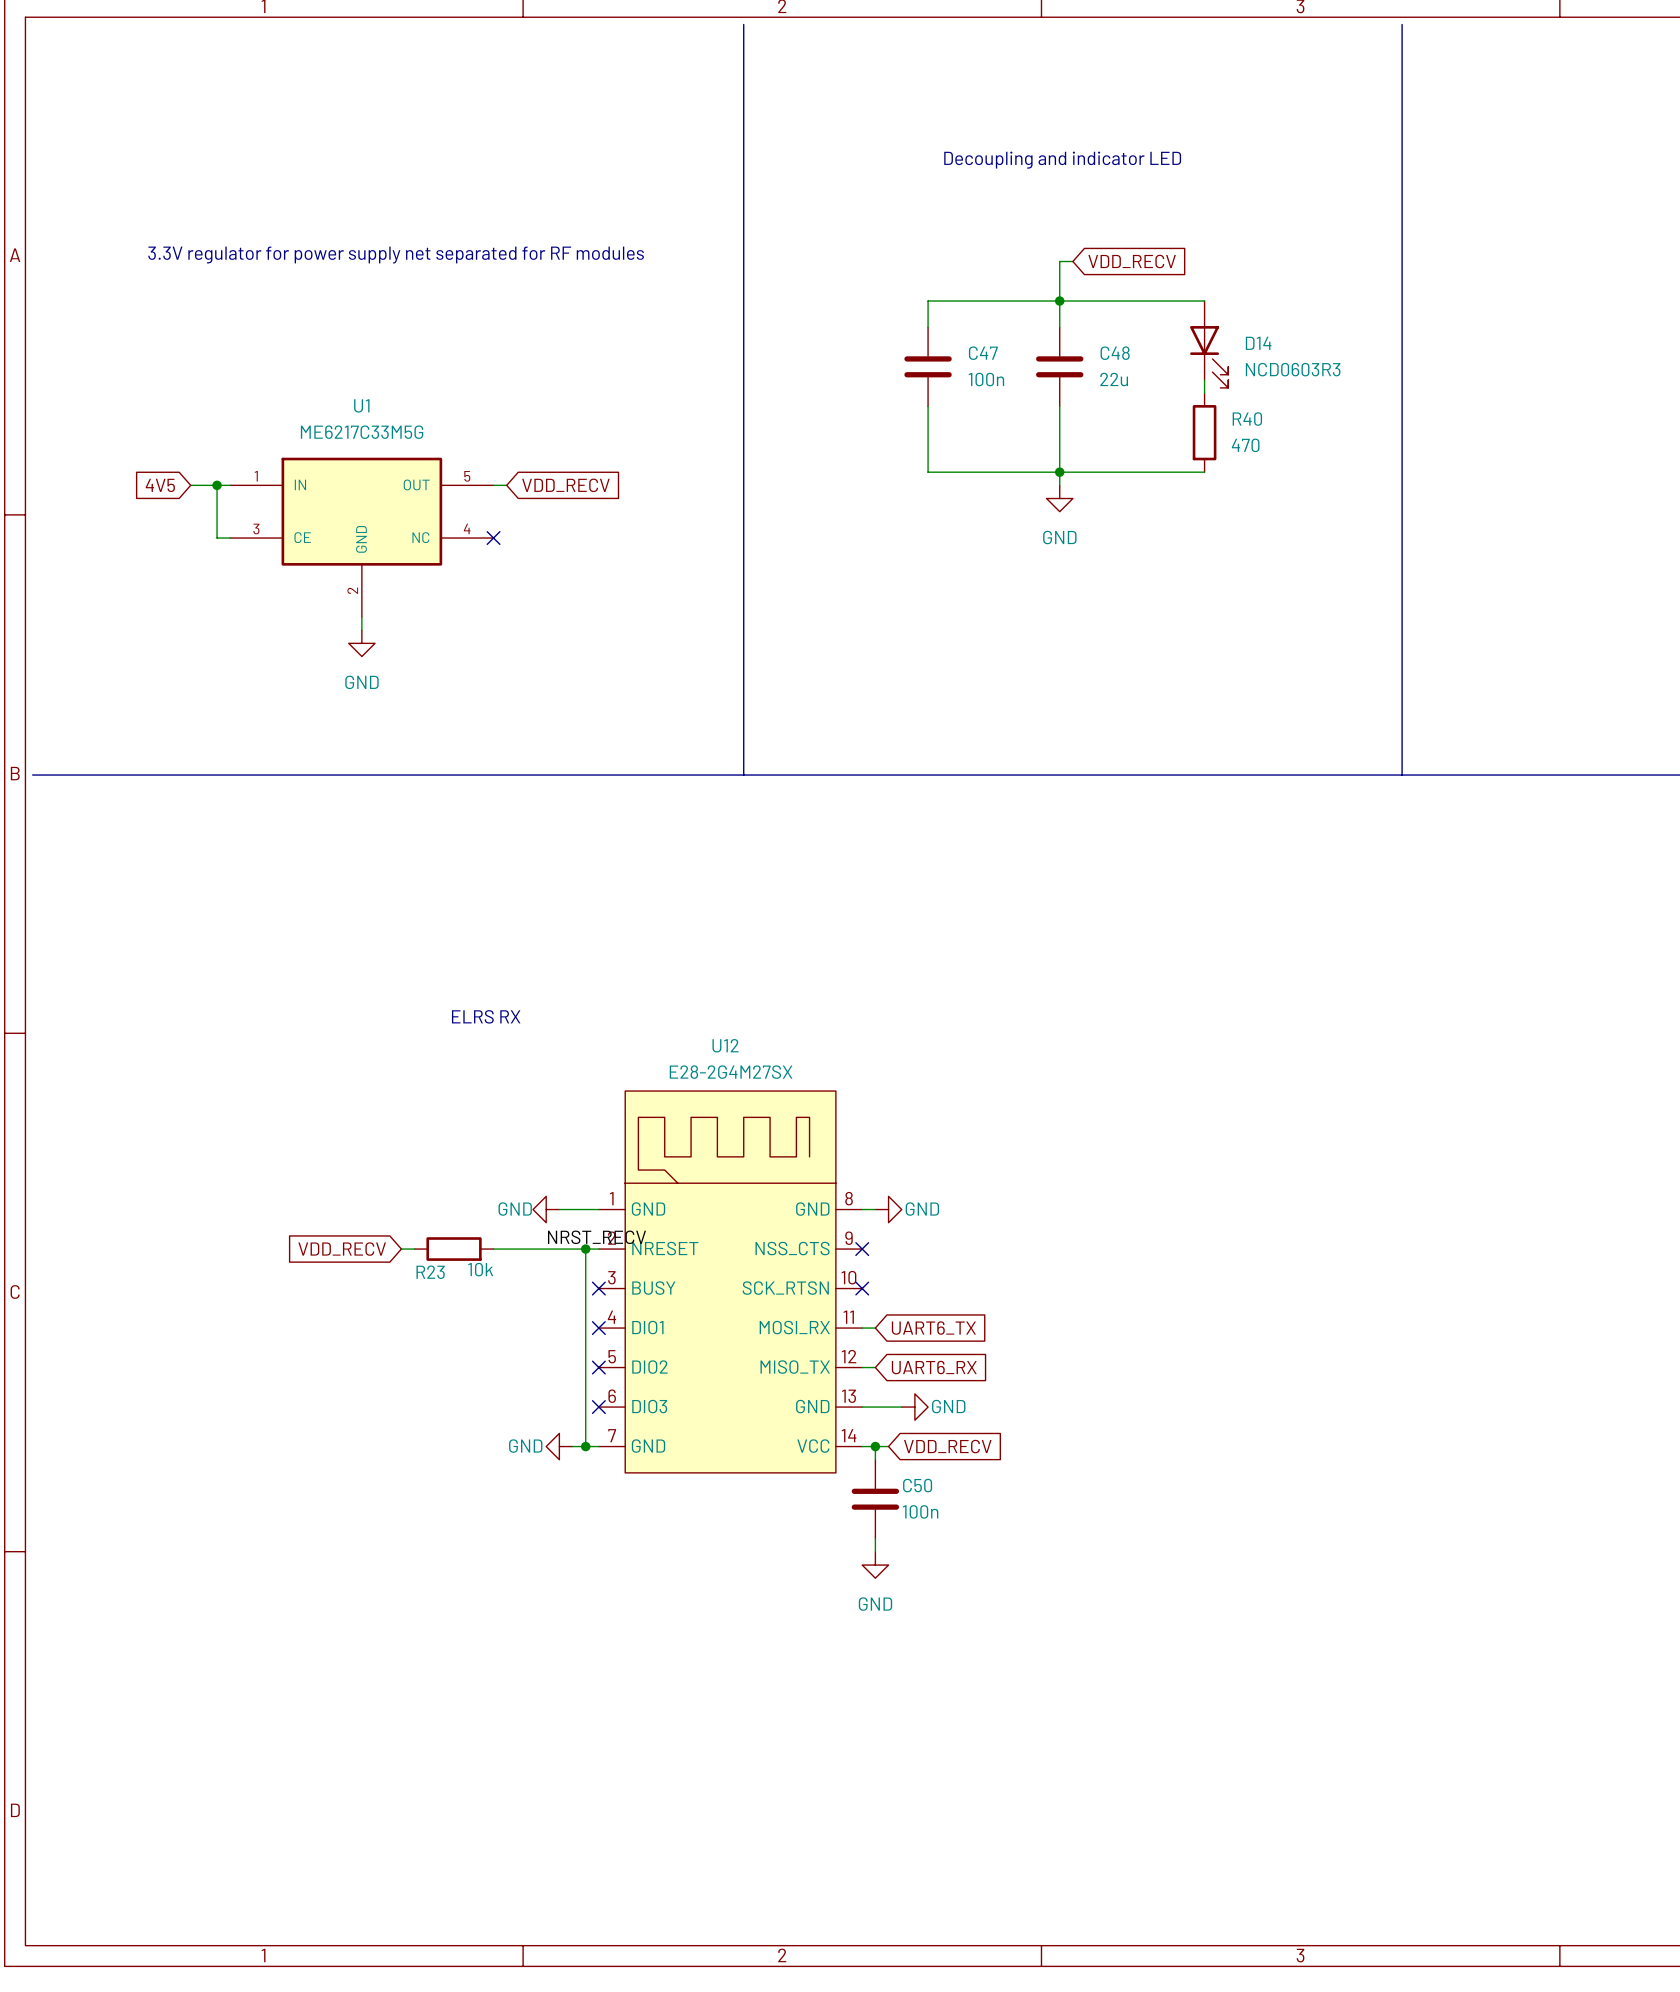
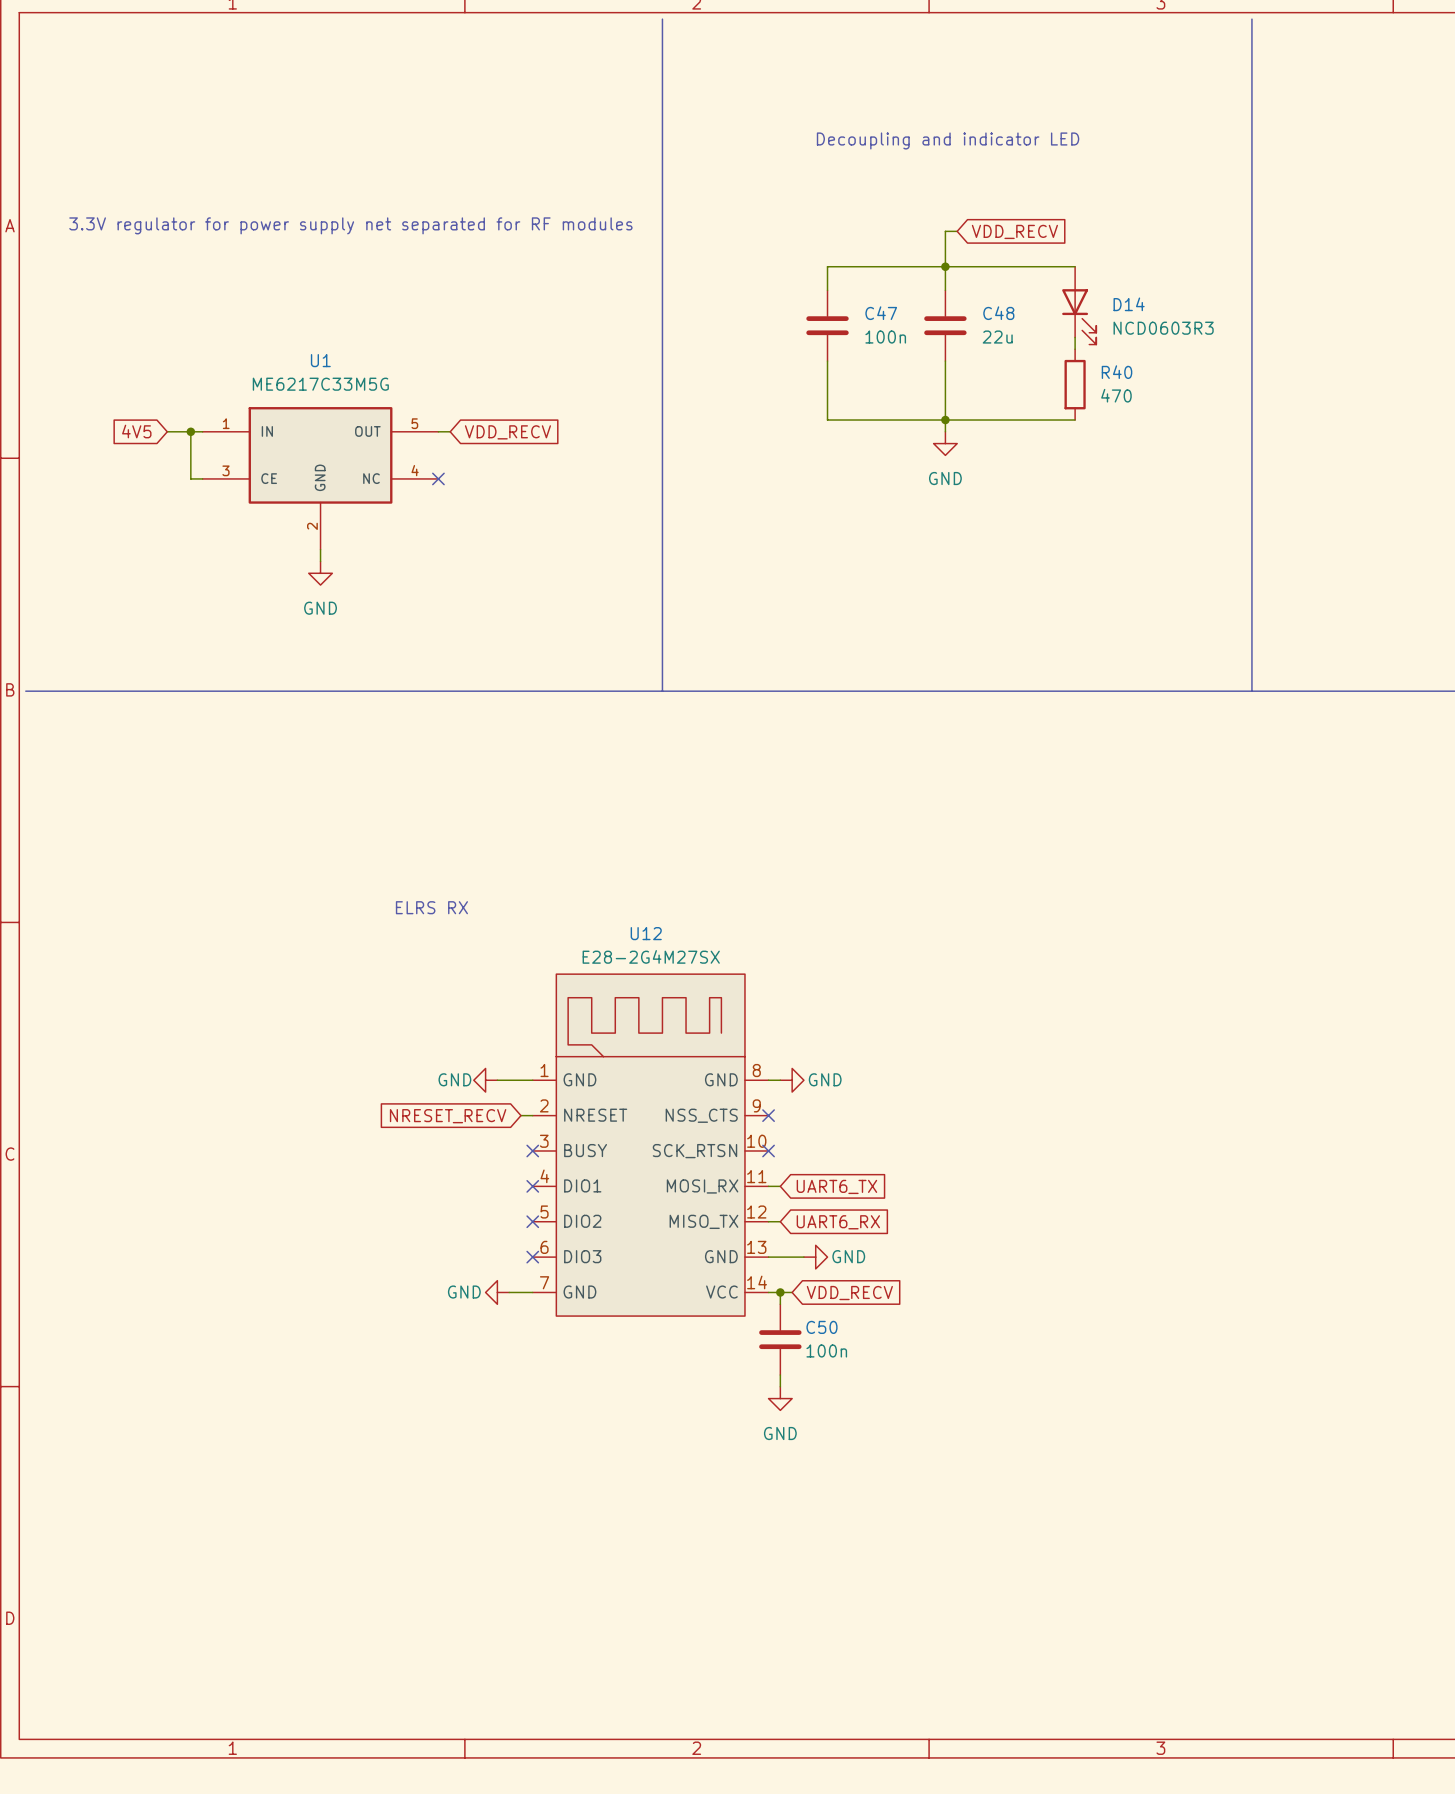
label: NRST_RECV (596, 1237) -> none
global label: VDD_RECV (342, 1249) -> none
wire: (401, 1249) (414, 1249) -> none
R23: 10k (454, 1249) -> none
wire: (493, 1249) (585, 1249) (585, 1446) -> none
global label: none -> NRESET_RECV (448, 1116)
junction: (585, 1249) -> none
junction: (585, 1446) -> none

